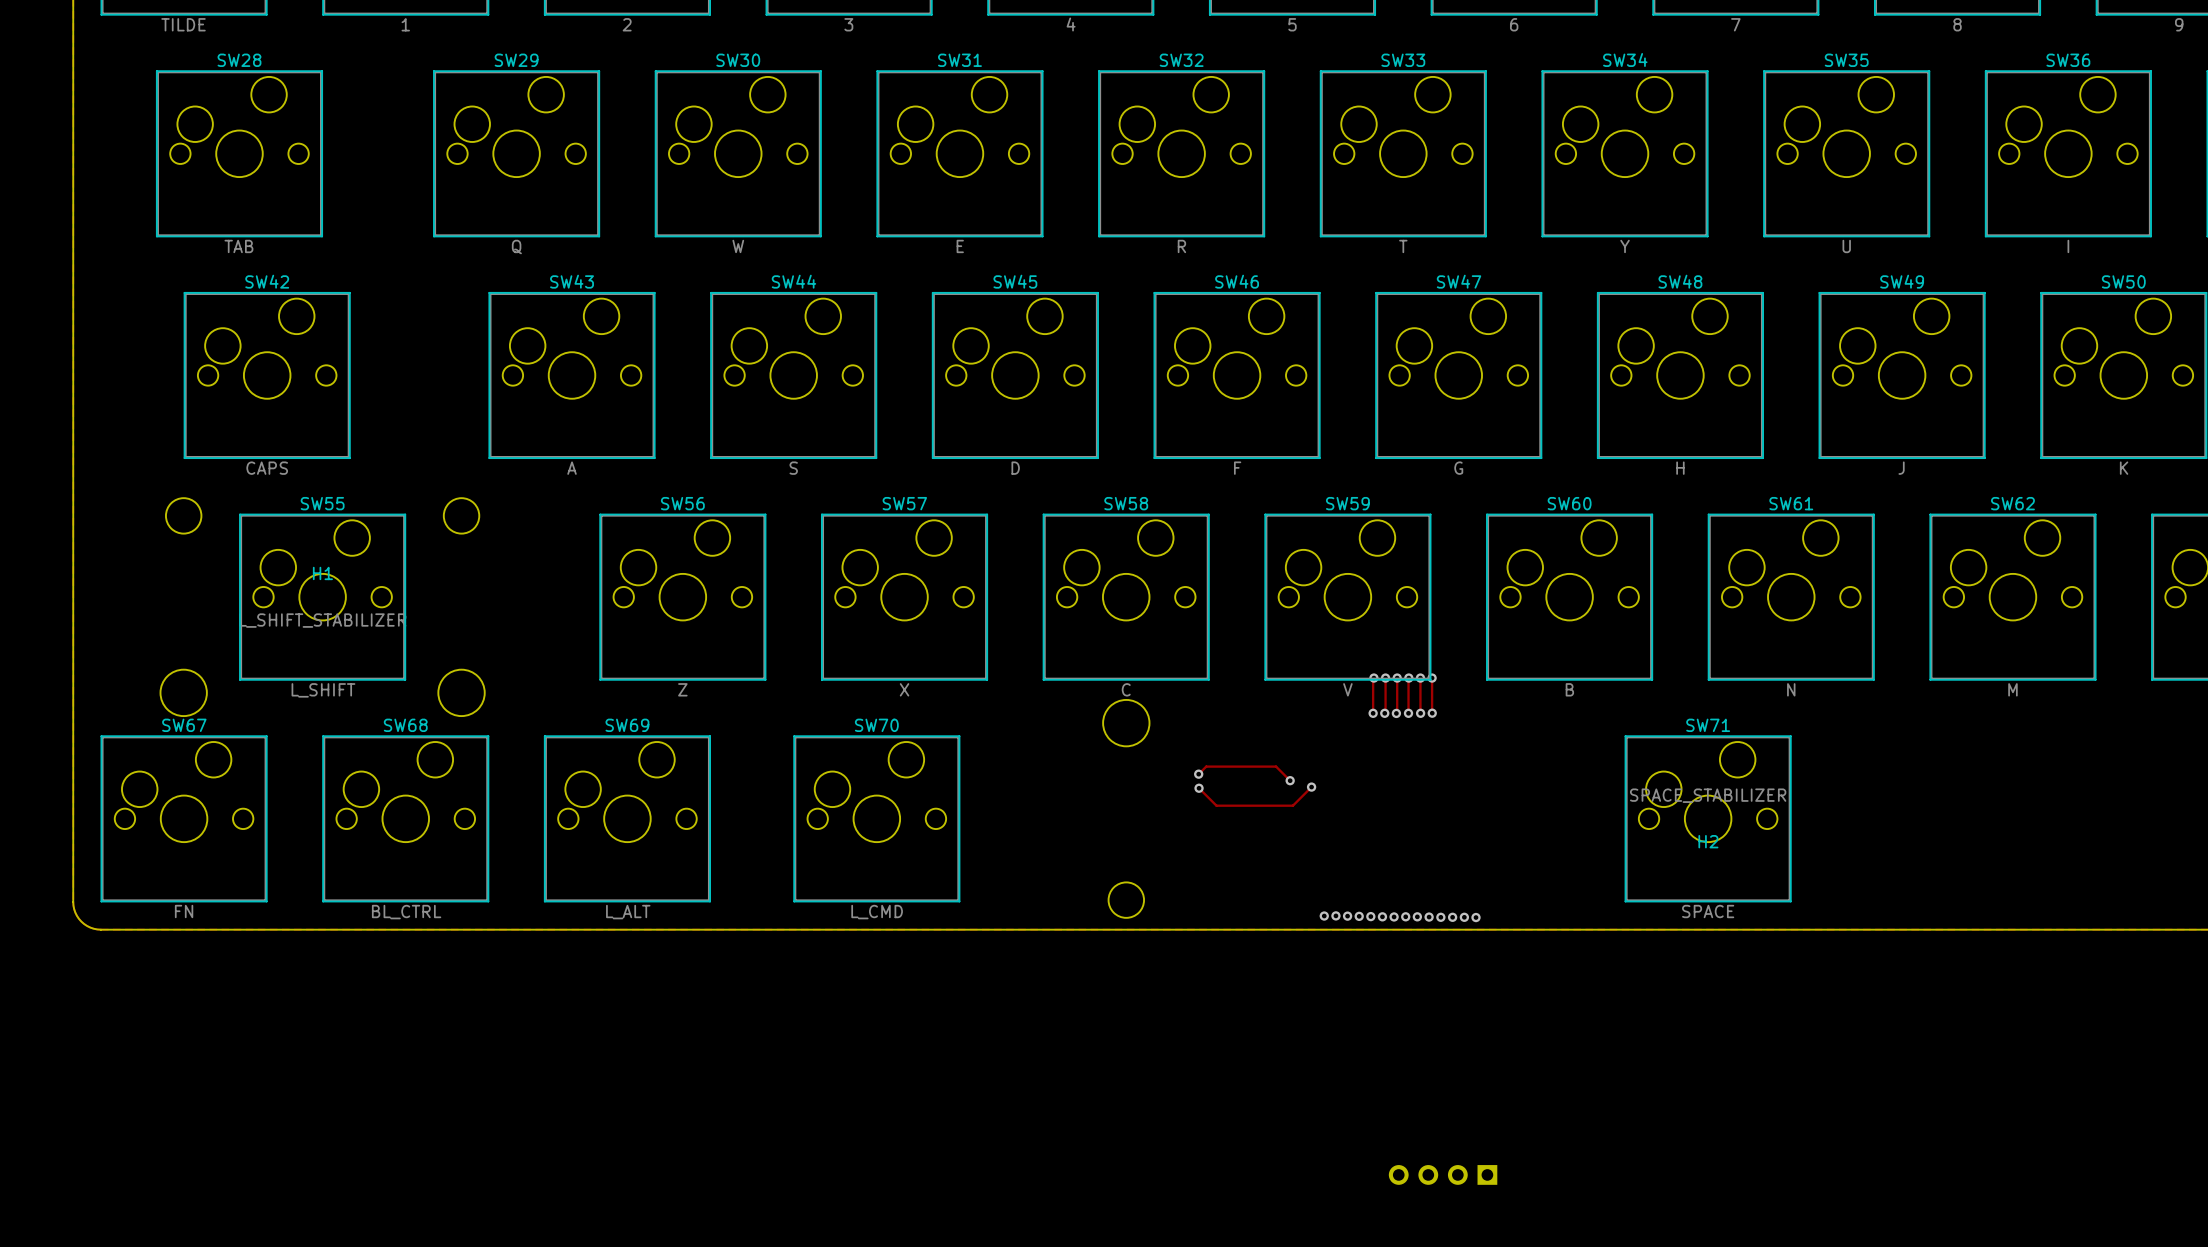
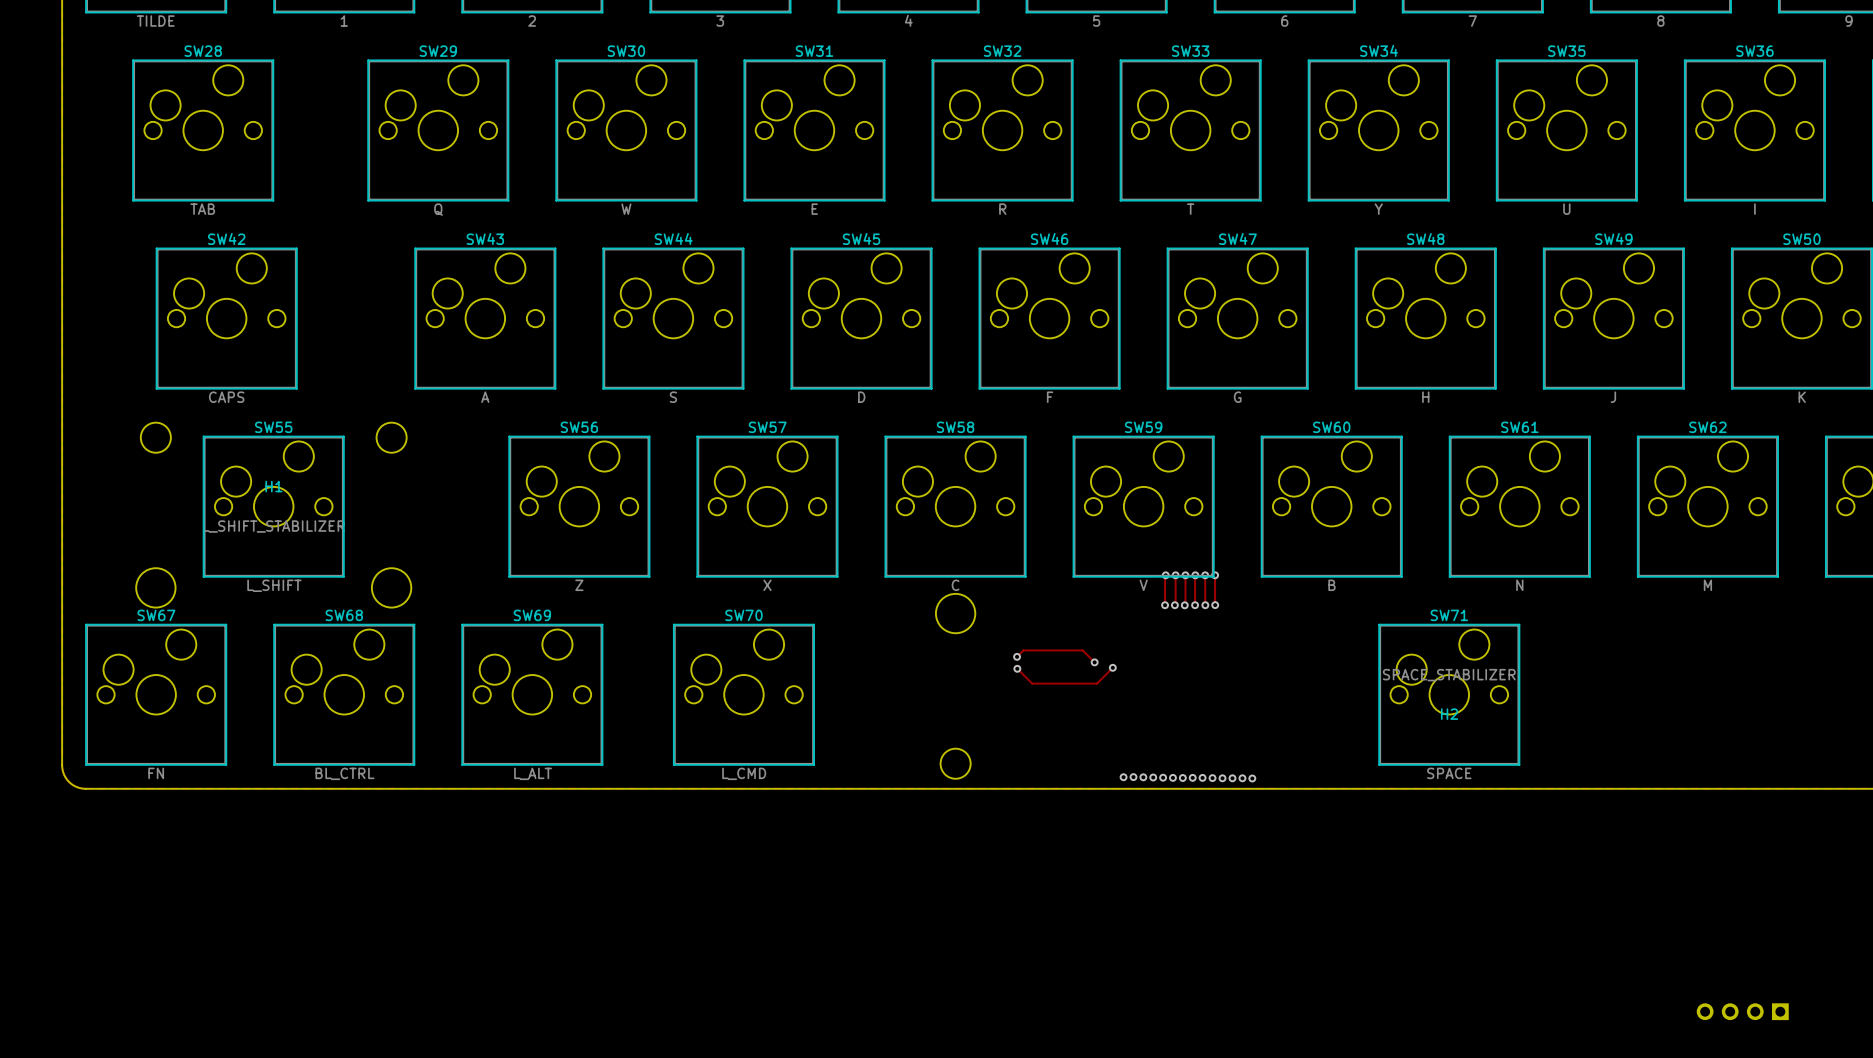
part: (1443, 1174) -> none
part: none -> (1742, 1011)

